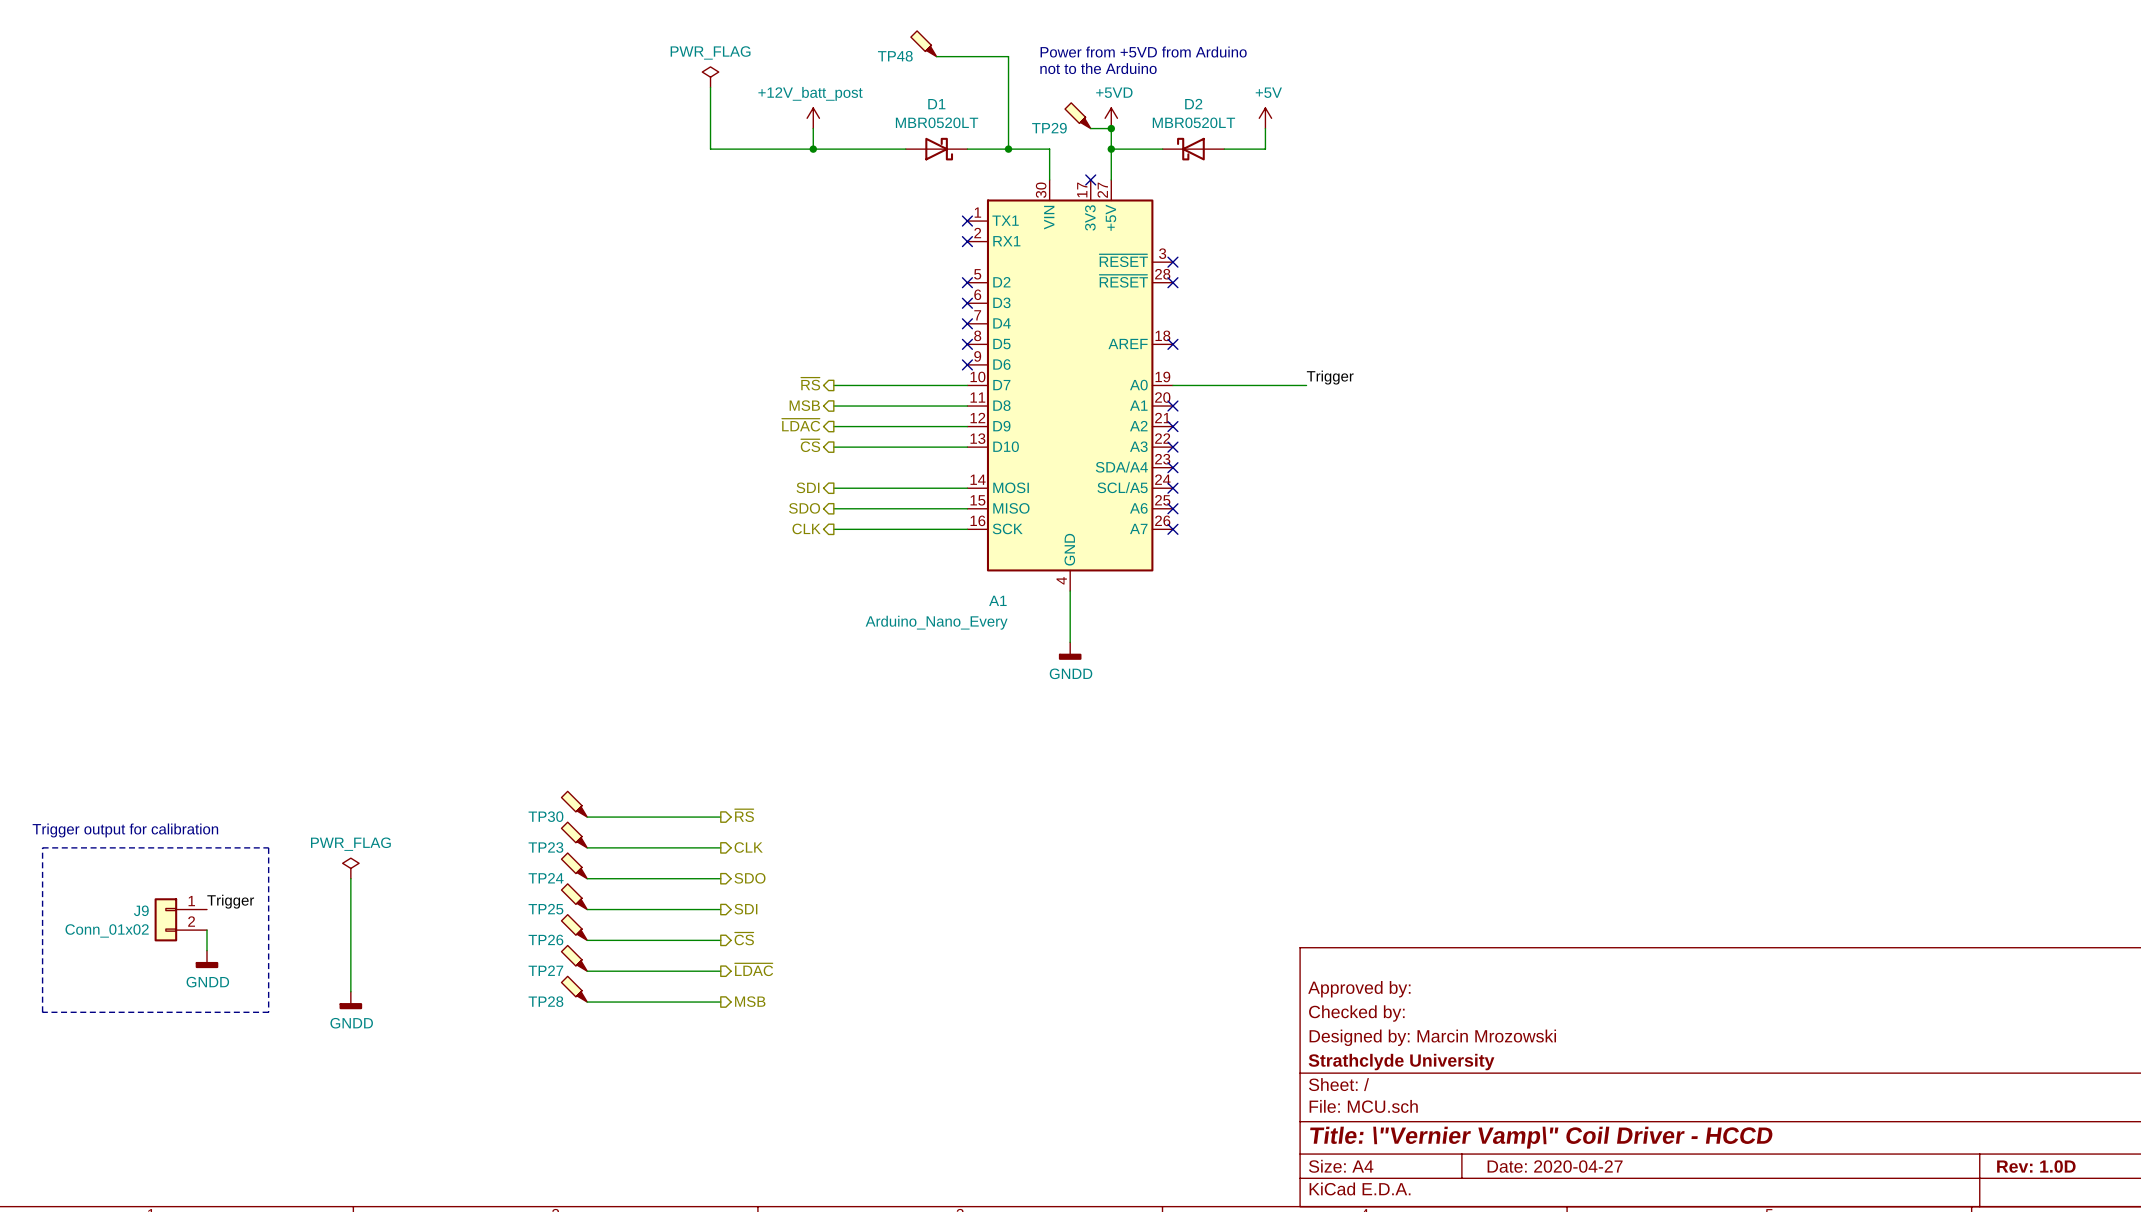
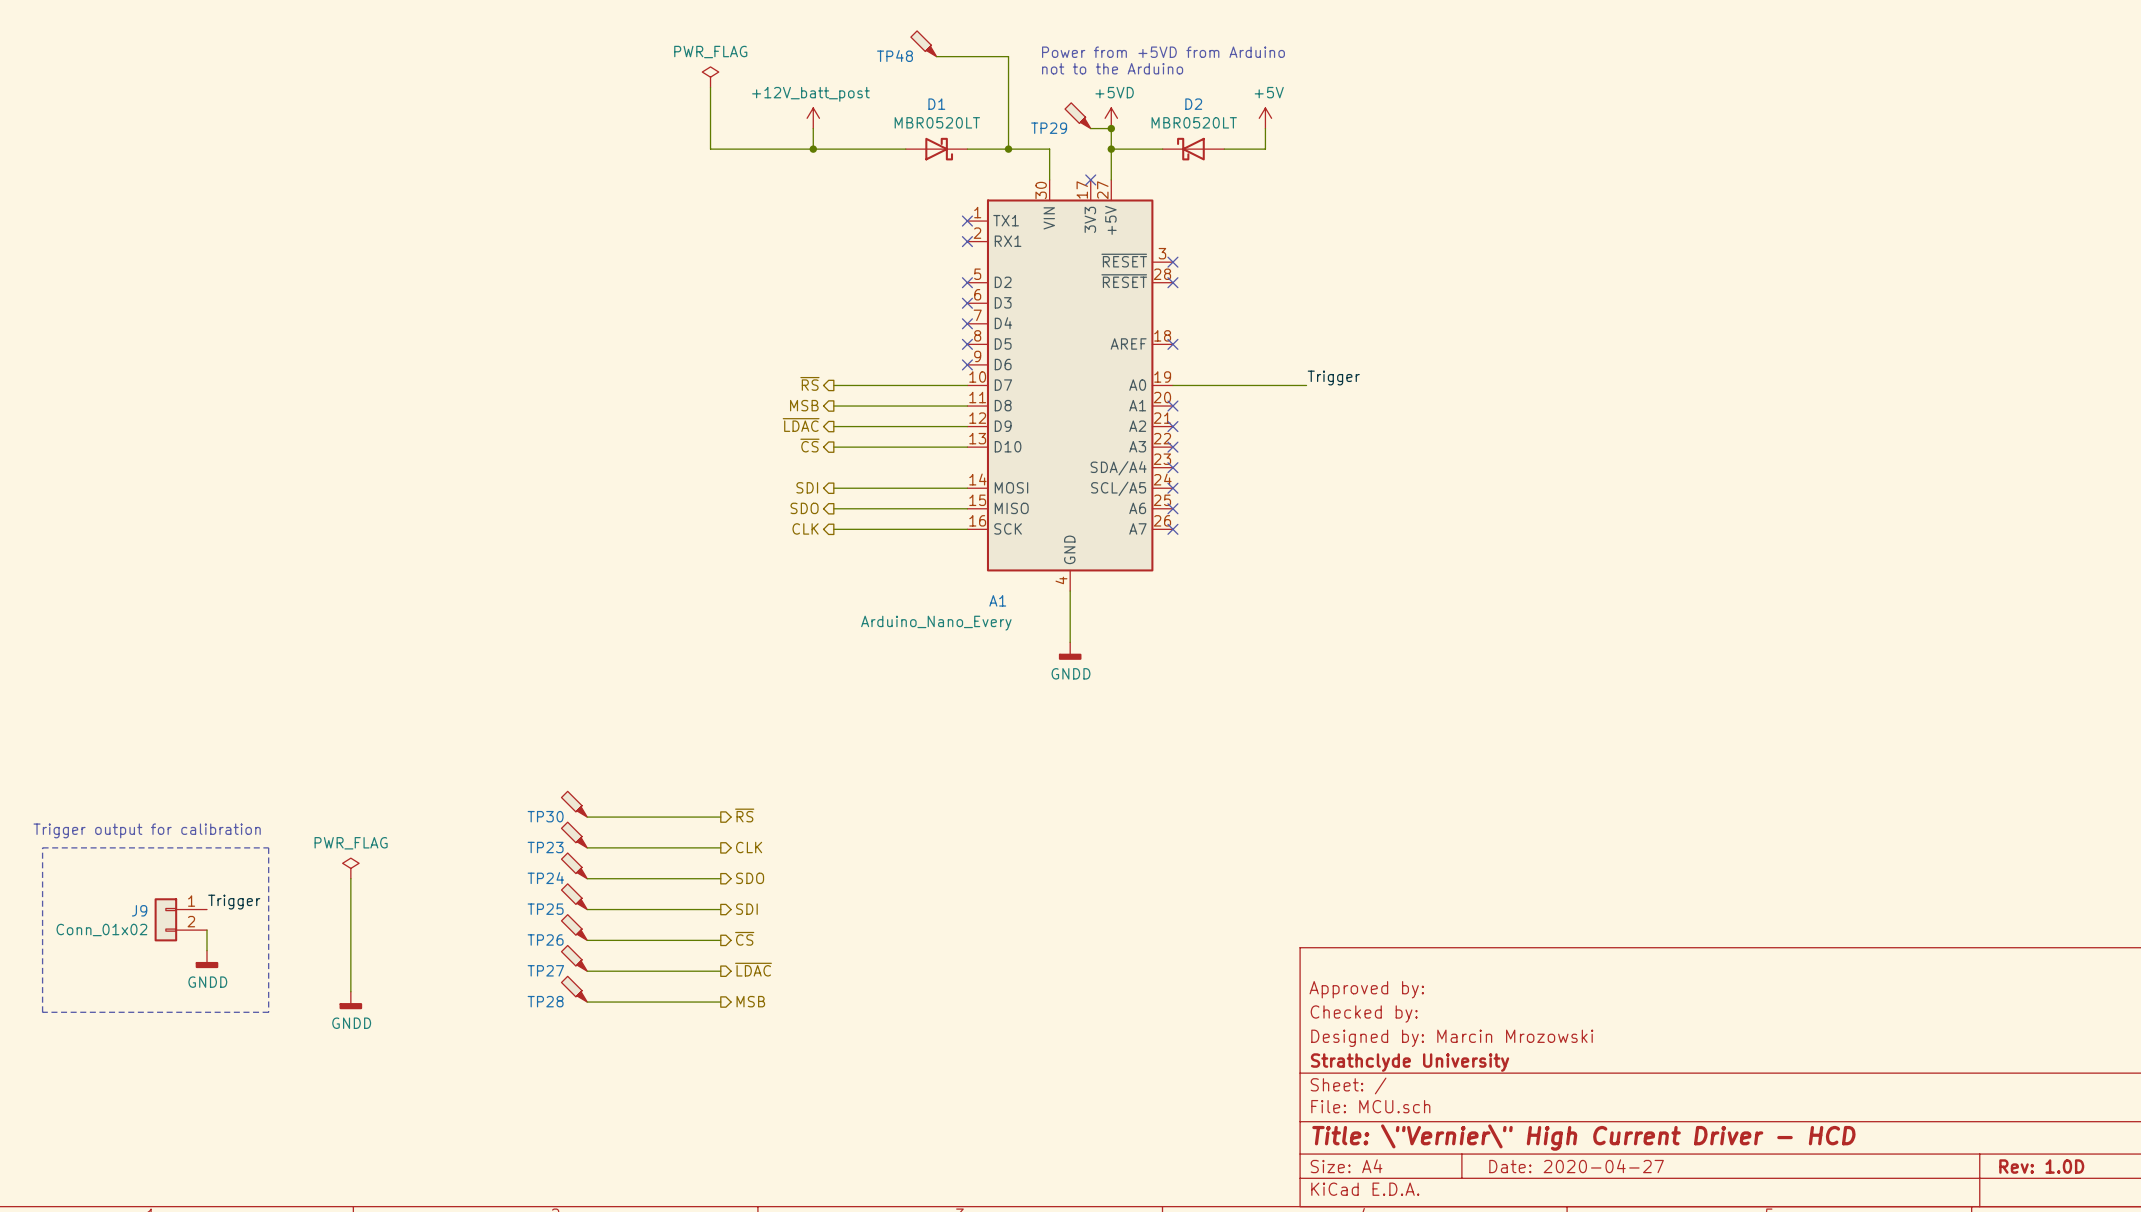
title block: Title: \"Vernier Vamp\" Coil Driver - HCCD (1541, 1137) -> Title: \"Vernier\" High Current Driver - HCD (1583, 1137)

